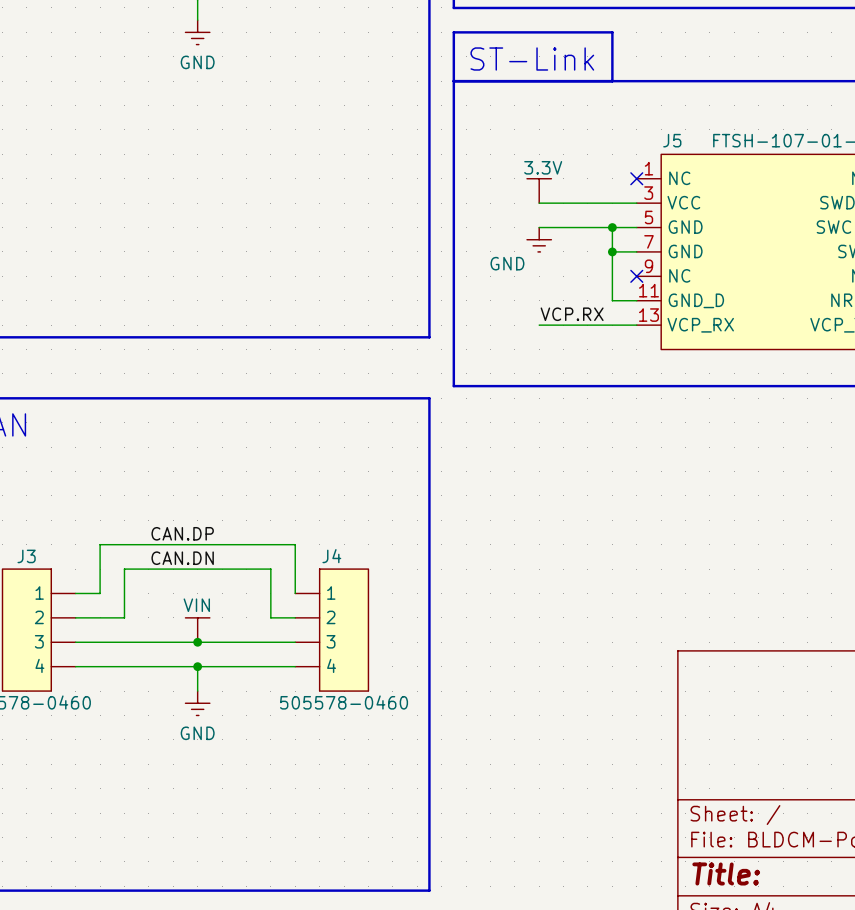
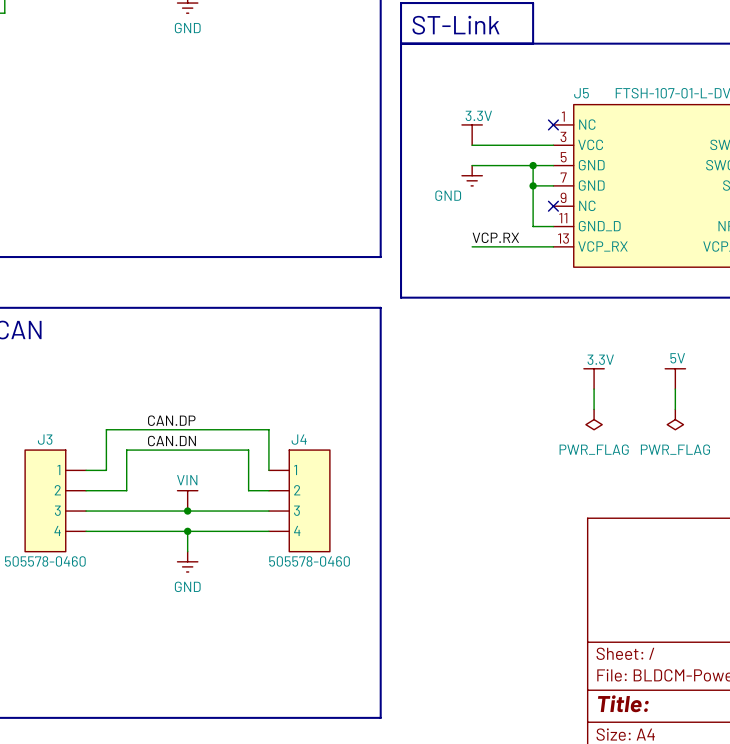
power symbol: none -> 3.3V (594, 378)
power symbol: none -> 5V (675, 378)
wire: none -> (594, 389) (594, 409)
wire: none -> (675, 389) (675, 409)
power symbol: none -> PWR_FLAG (594, 419)
power symbol: none -> PWR_FLAG (675, 419)

